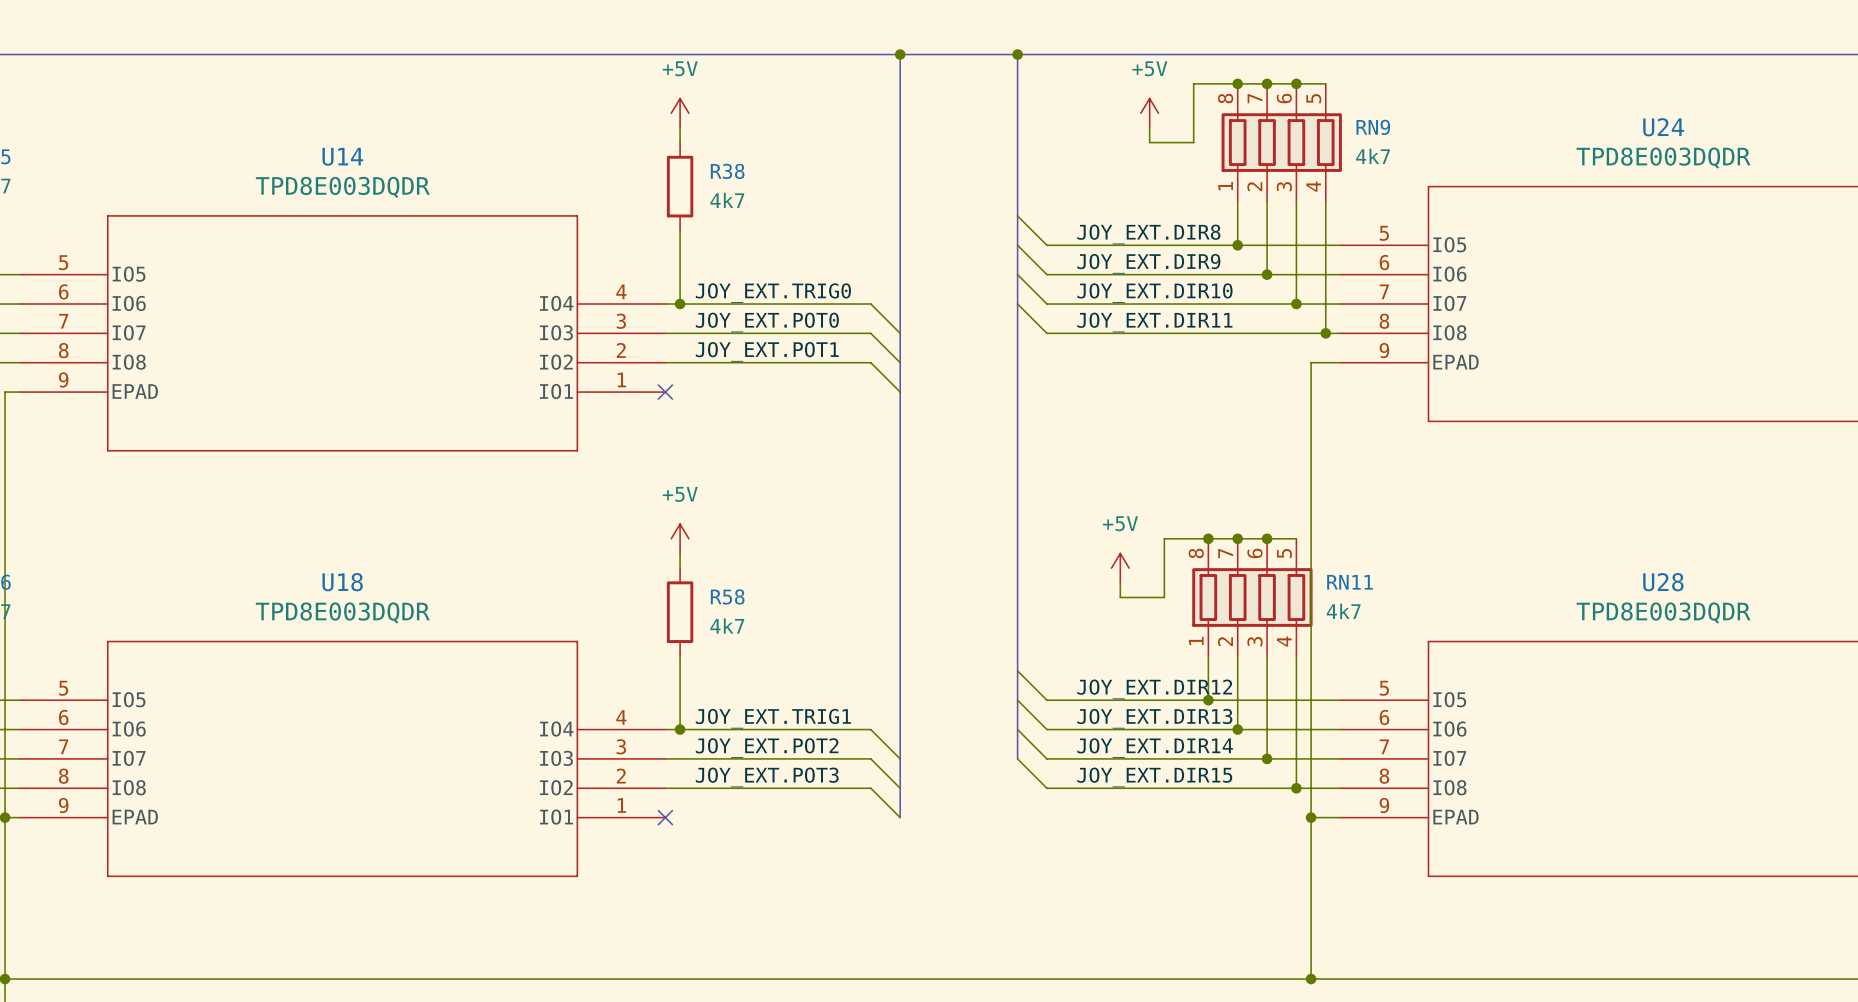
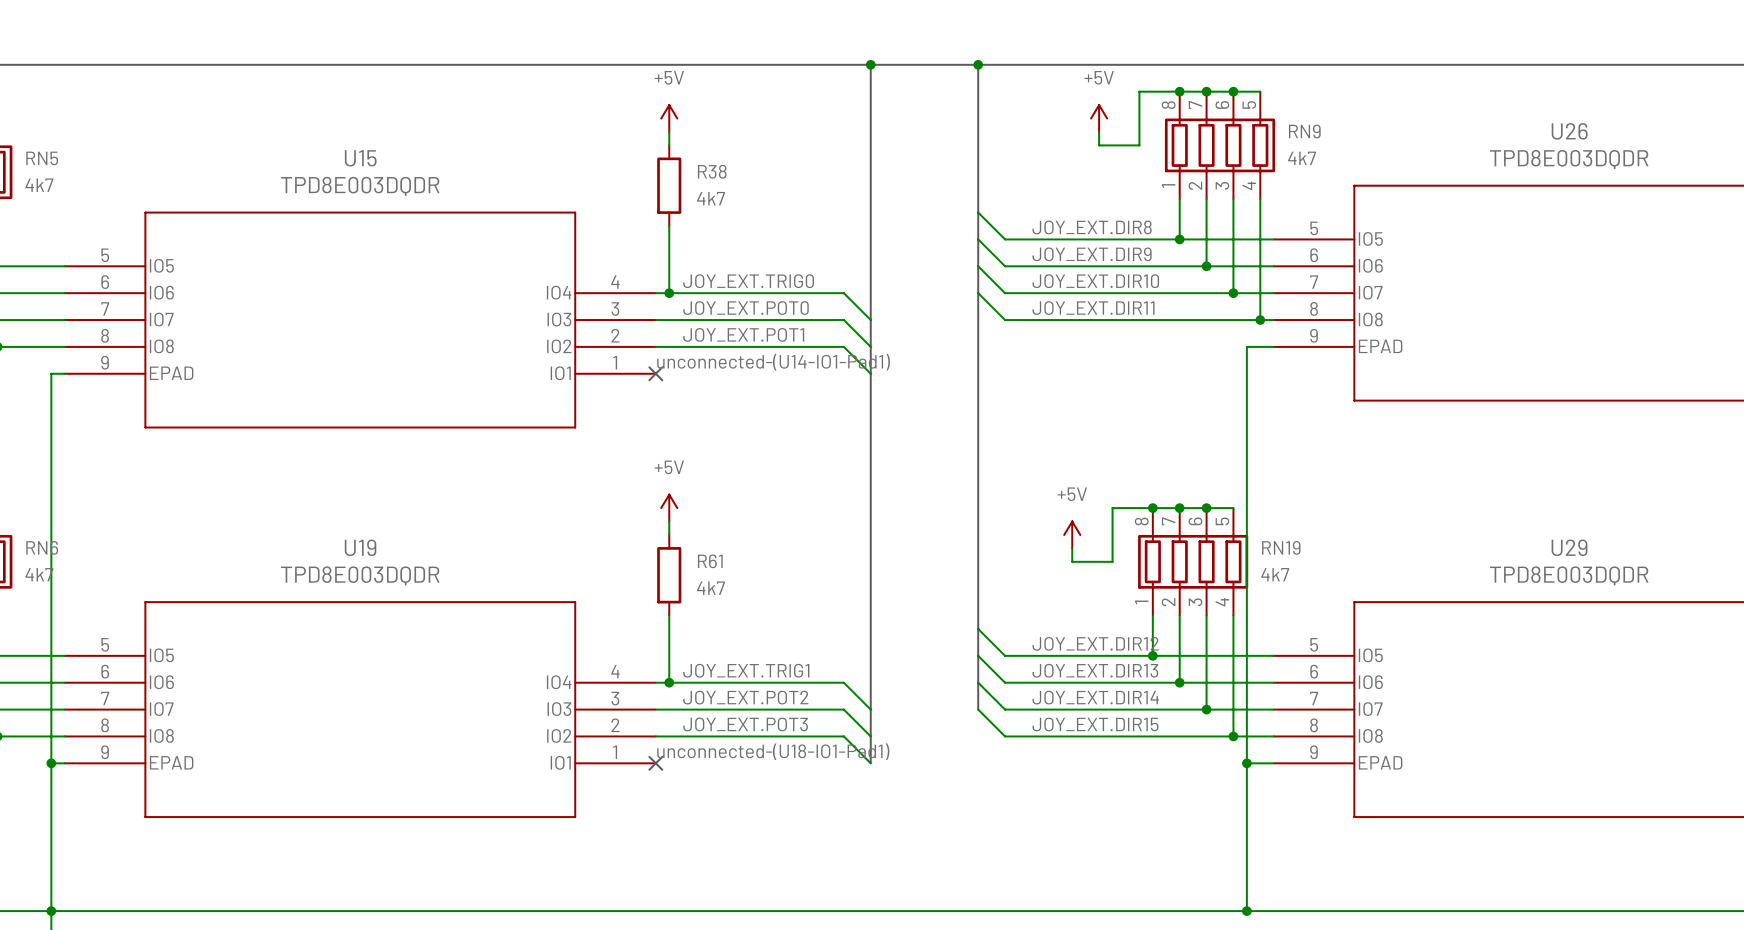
U24 name: U24 (1663, 127) -> U26 (1569, 131)
U14 name: U14 (342, 156) -> U15 (360, 158)
label: none -> unconnected-(U14-IO1-Pad1) (773, 362)
U18 name: U18 (342, 582) -> U19 (360, 547)
RN11 name: RN11 (1350, 582) -> RN19 (1281, 547)
U28 name: U28 (1663, 582) -> U29 (1569, 547)
R58 name: R58 (727, 596) -> R61 (710, 561)
label: none -> unconnected-(U18-IO1-Pad1) (773, 751)

